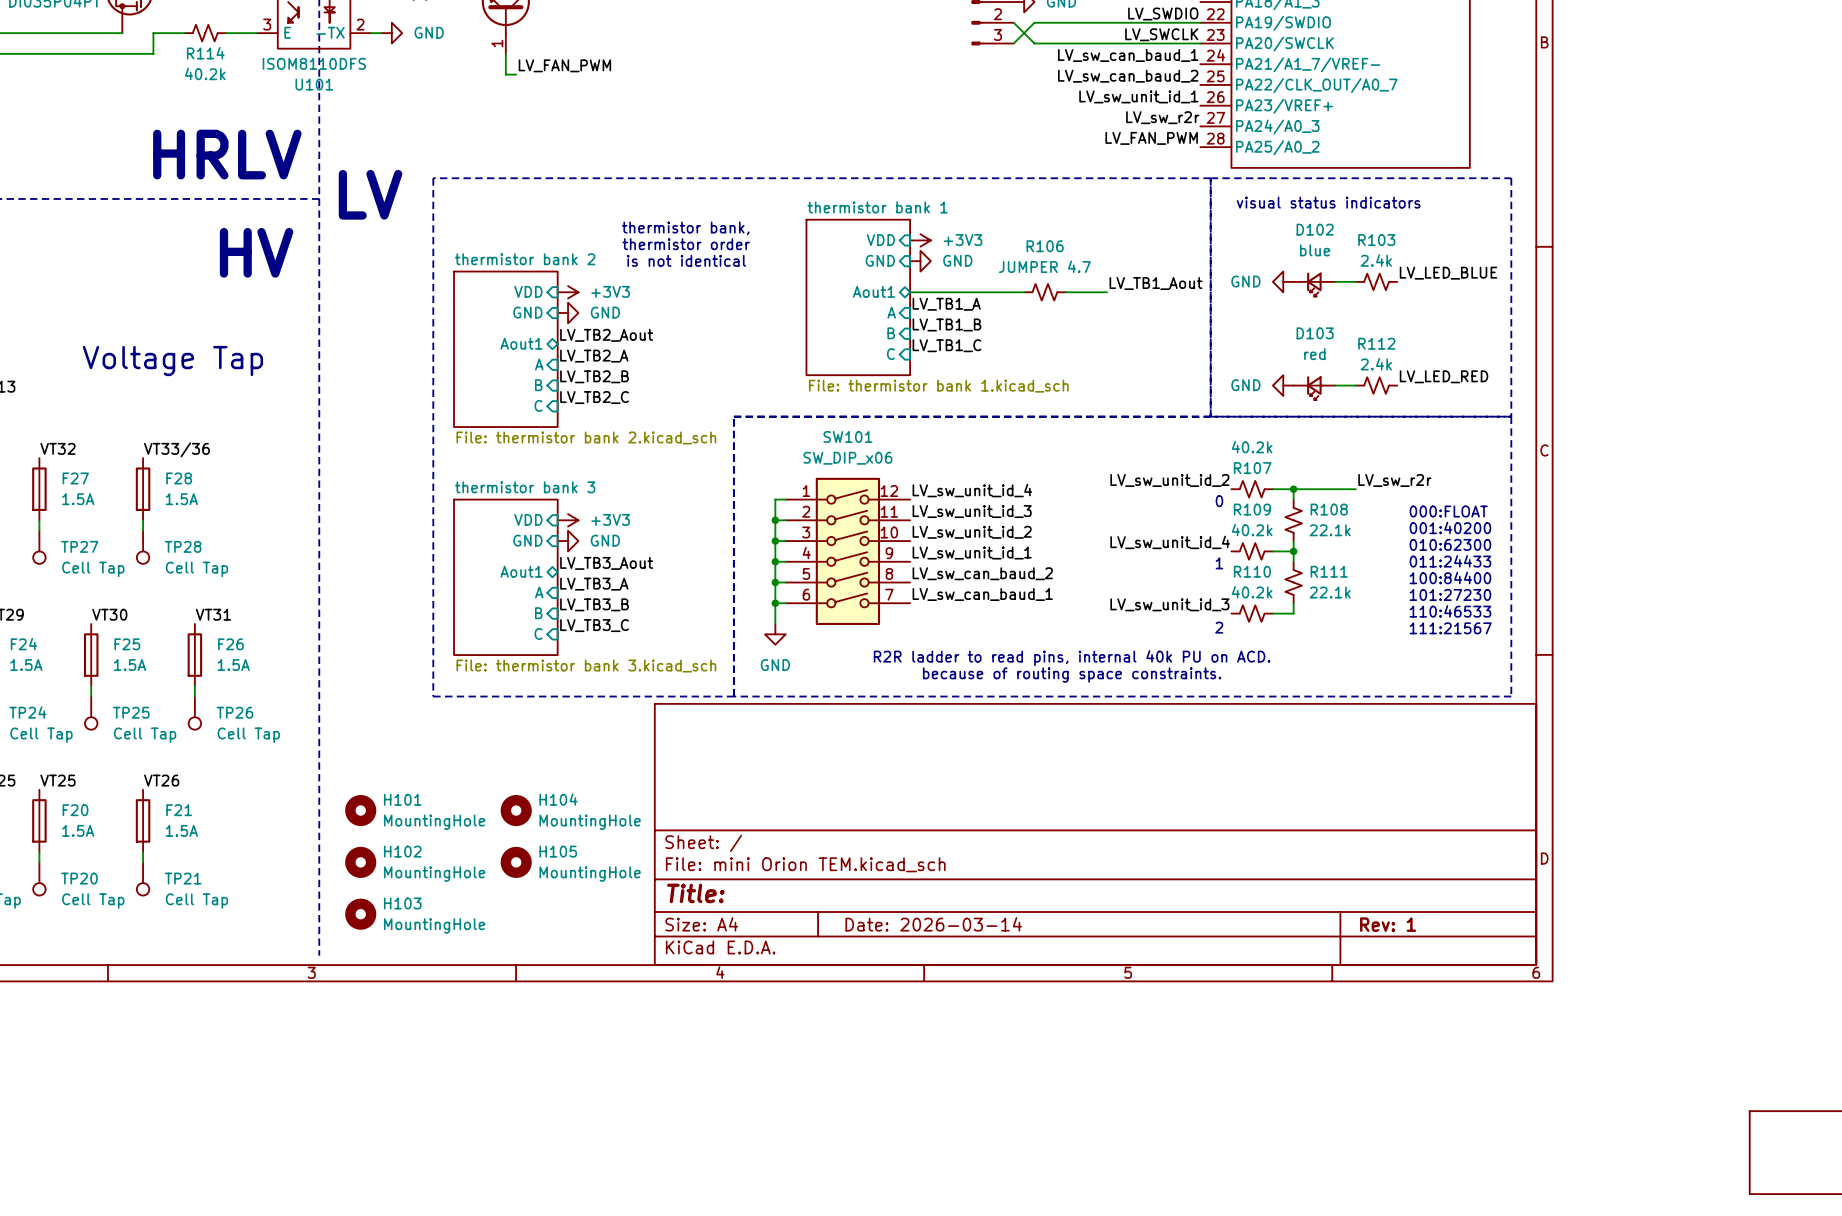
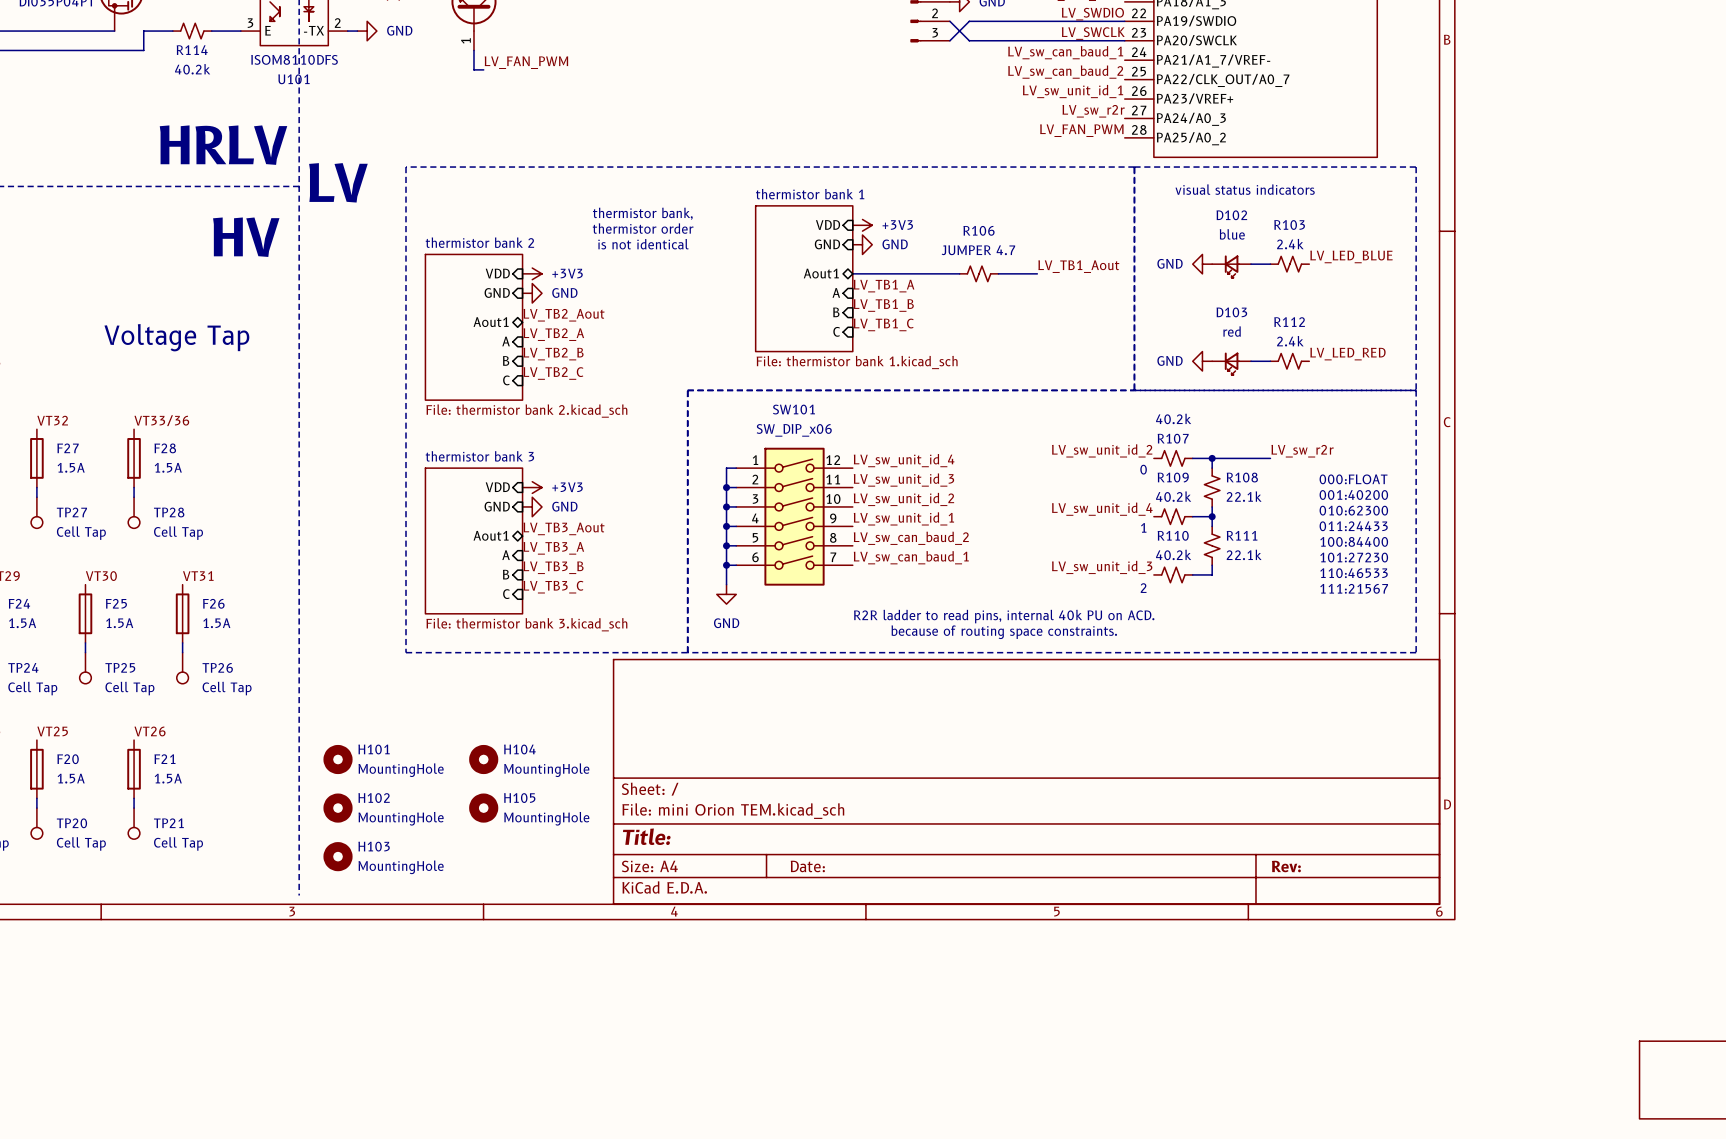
title block: Date: 2026-03-14 (933, 924) -> Date: (807, 866)
title block: Rev: 1 (1388, 924) -> Rev: (1286, 866)

